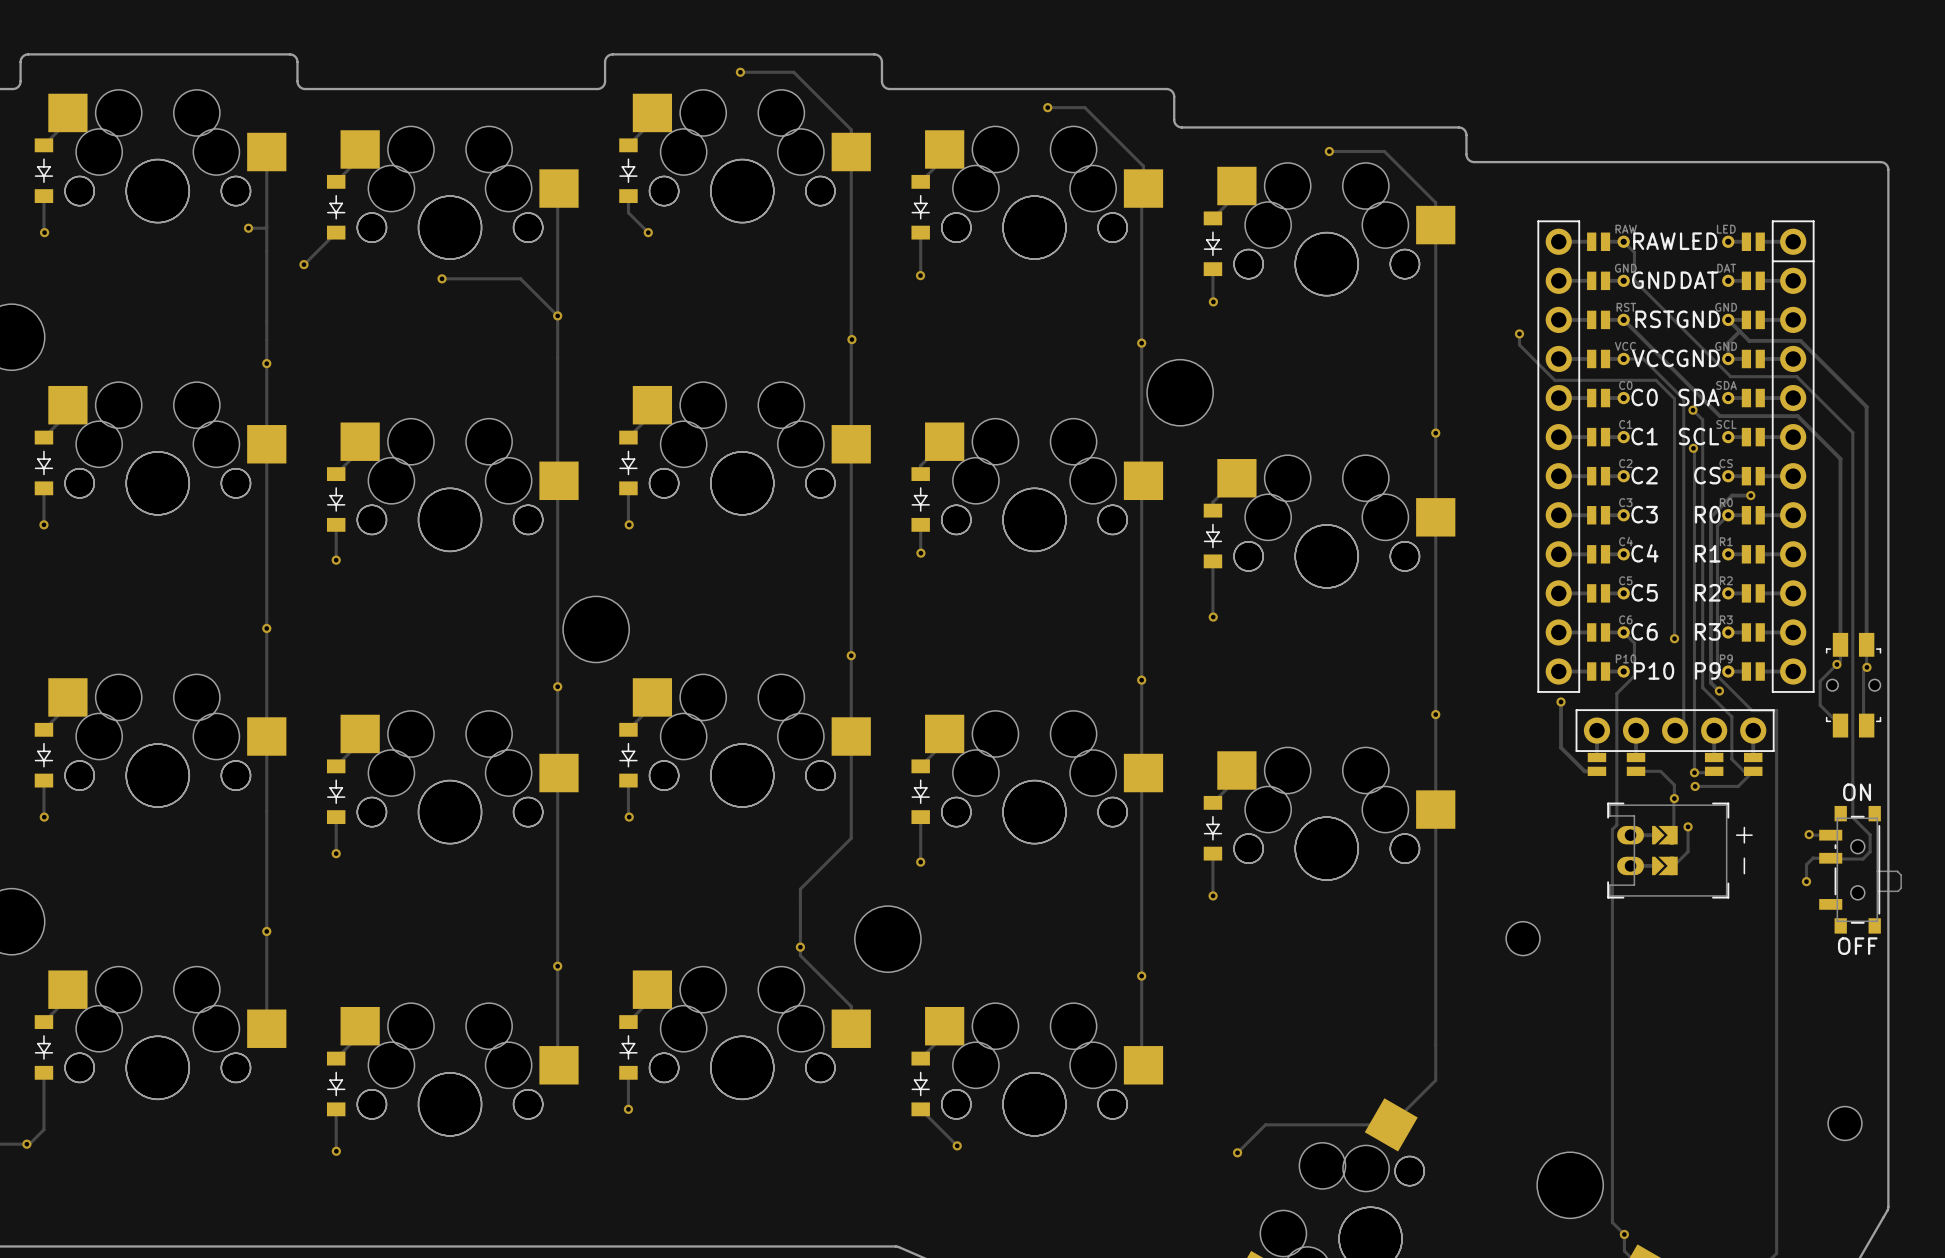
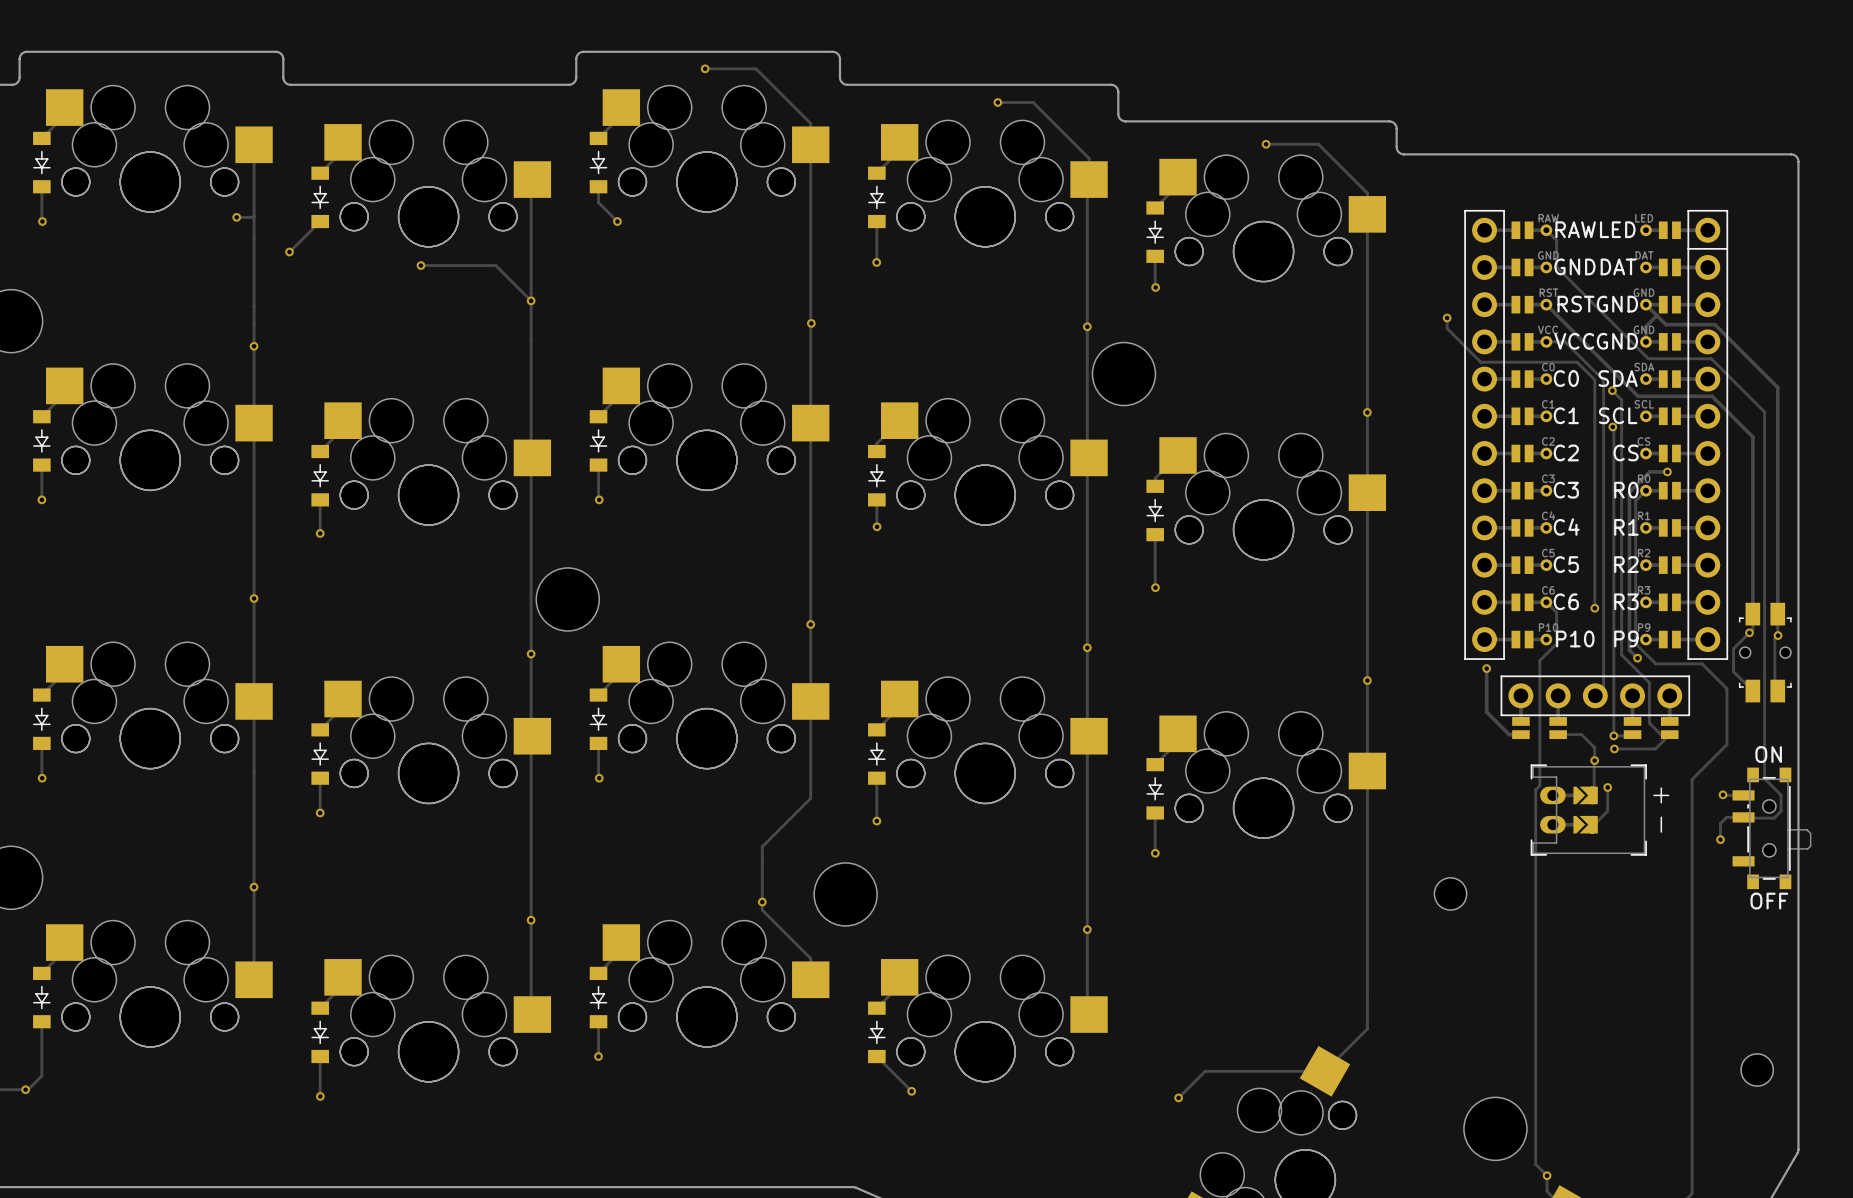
track: (1738, 697) (1752, 710) (1776, 710) (1776, 818) -> (1655, 663) (1702, 663) (1726, 688) (1726, 744) (1692, 779)

